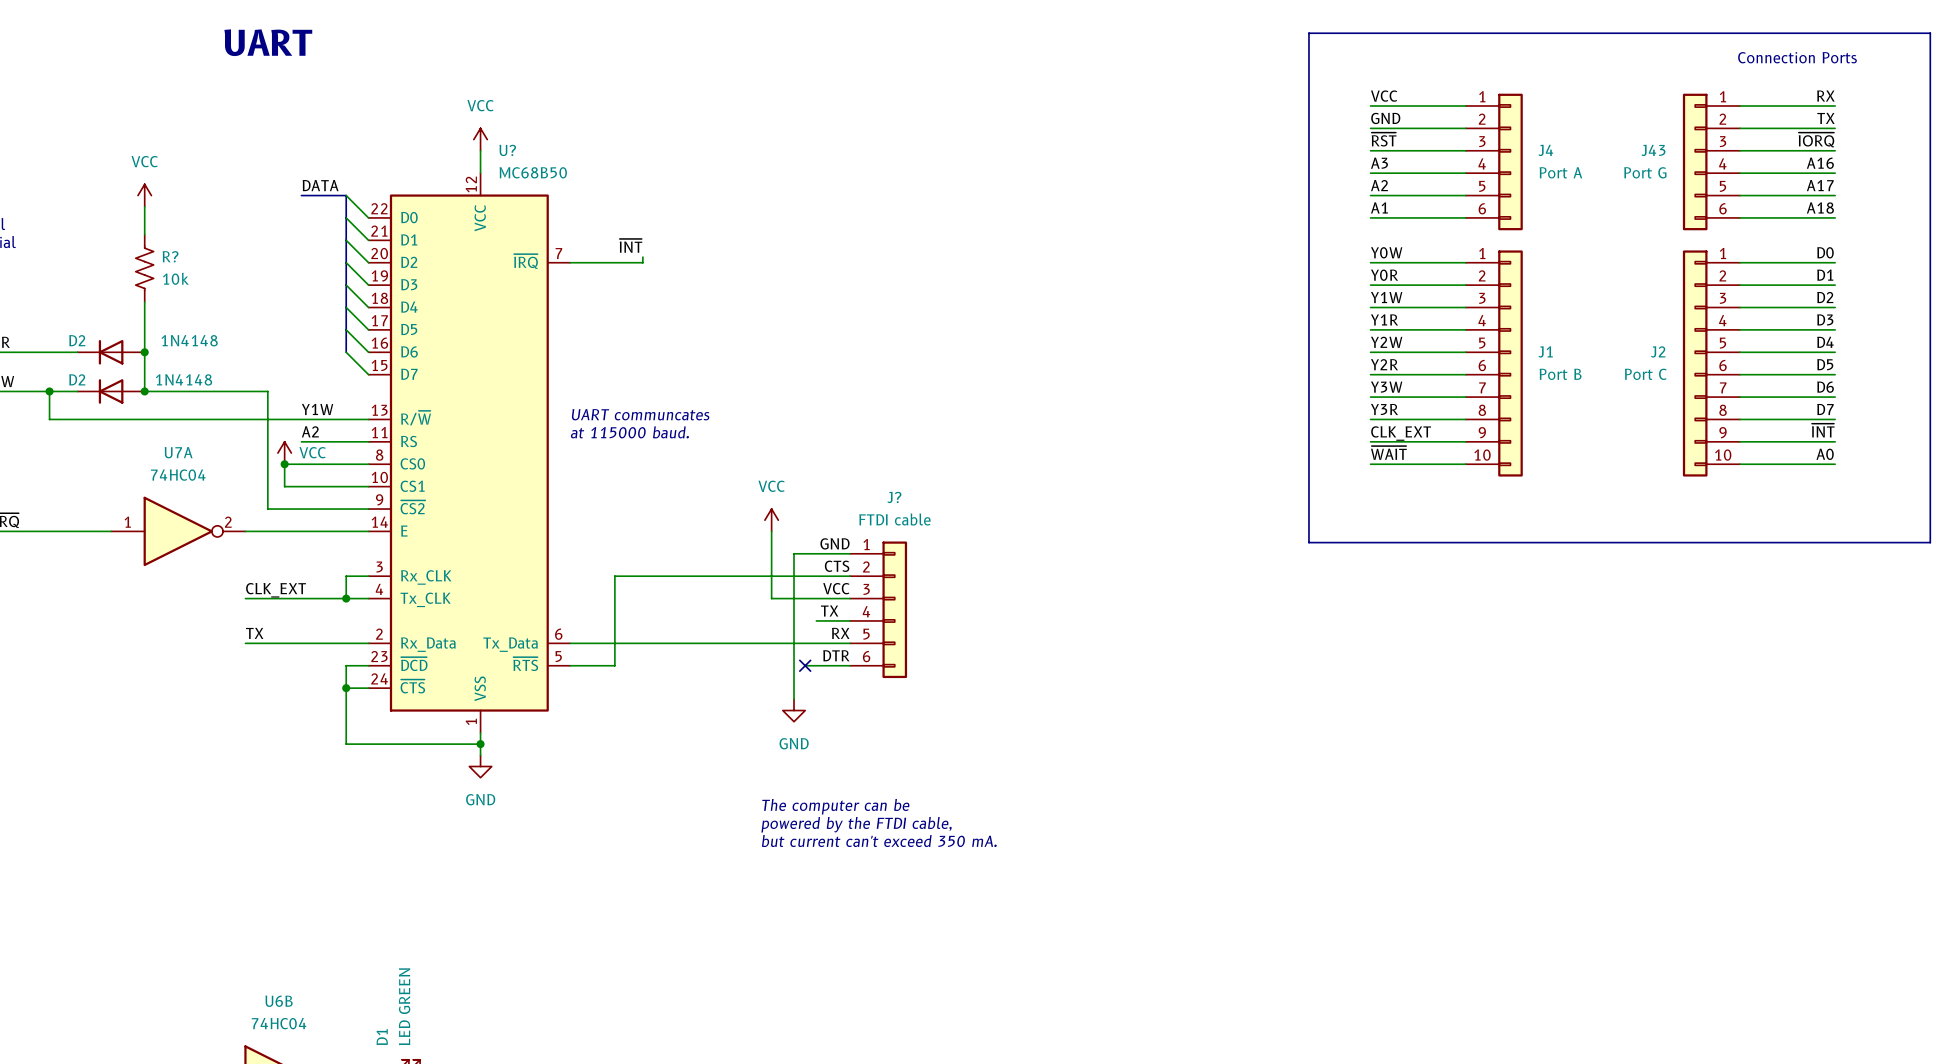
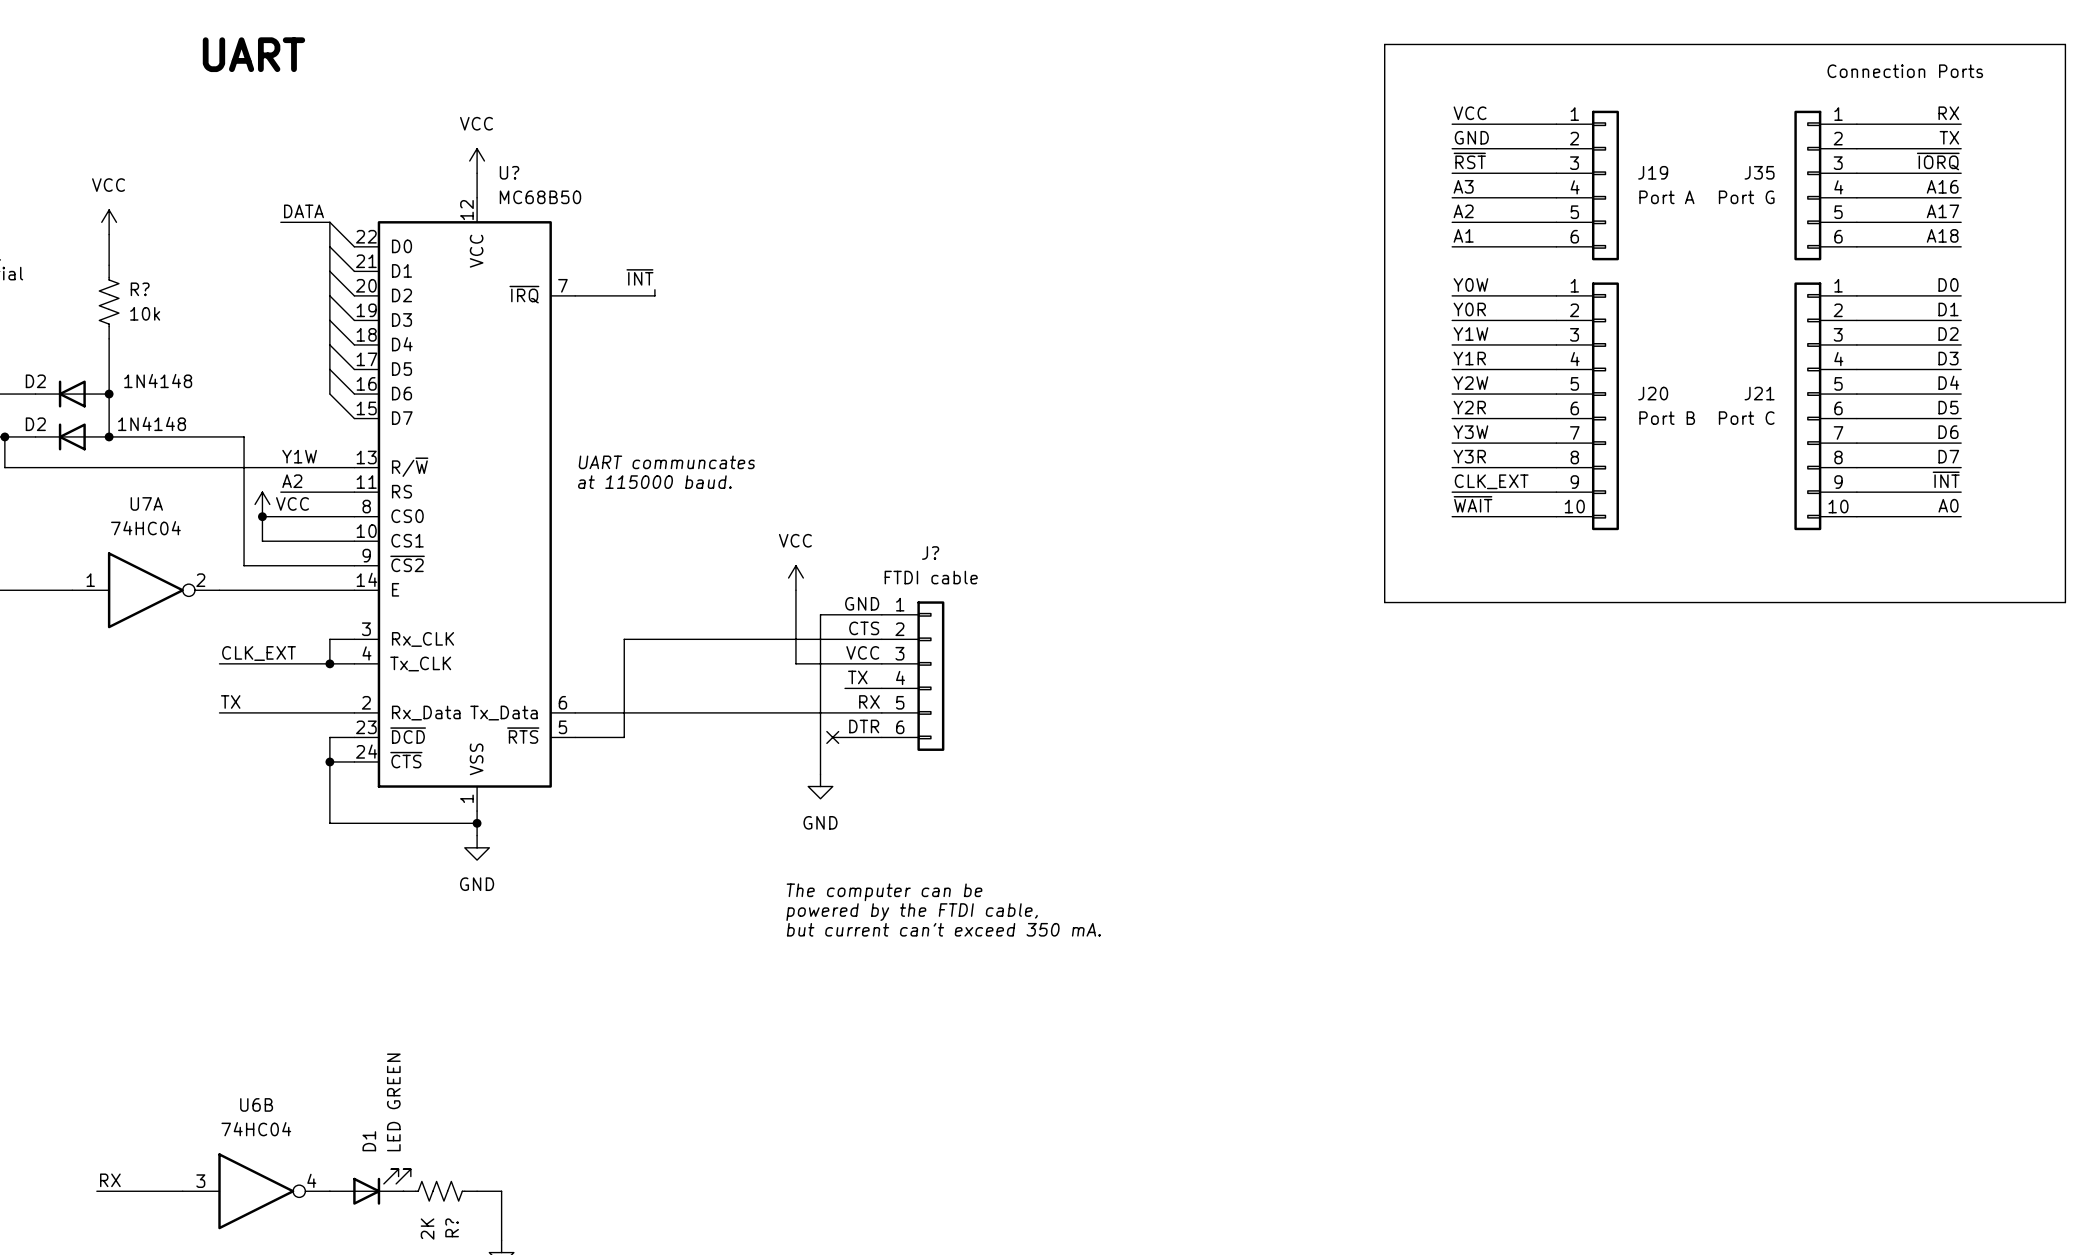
J4 name: J4 (1545, 150) -> J19 (1653, 172)
J43 name: J43 (1653, 150) -> J35 (1759, 172)
J1 name: J1 (1545, 351) -> J20 (1653, 393)
J2 name: J2 (1658, 351) -> J21 (1759, 393)

